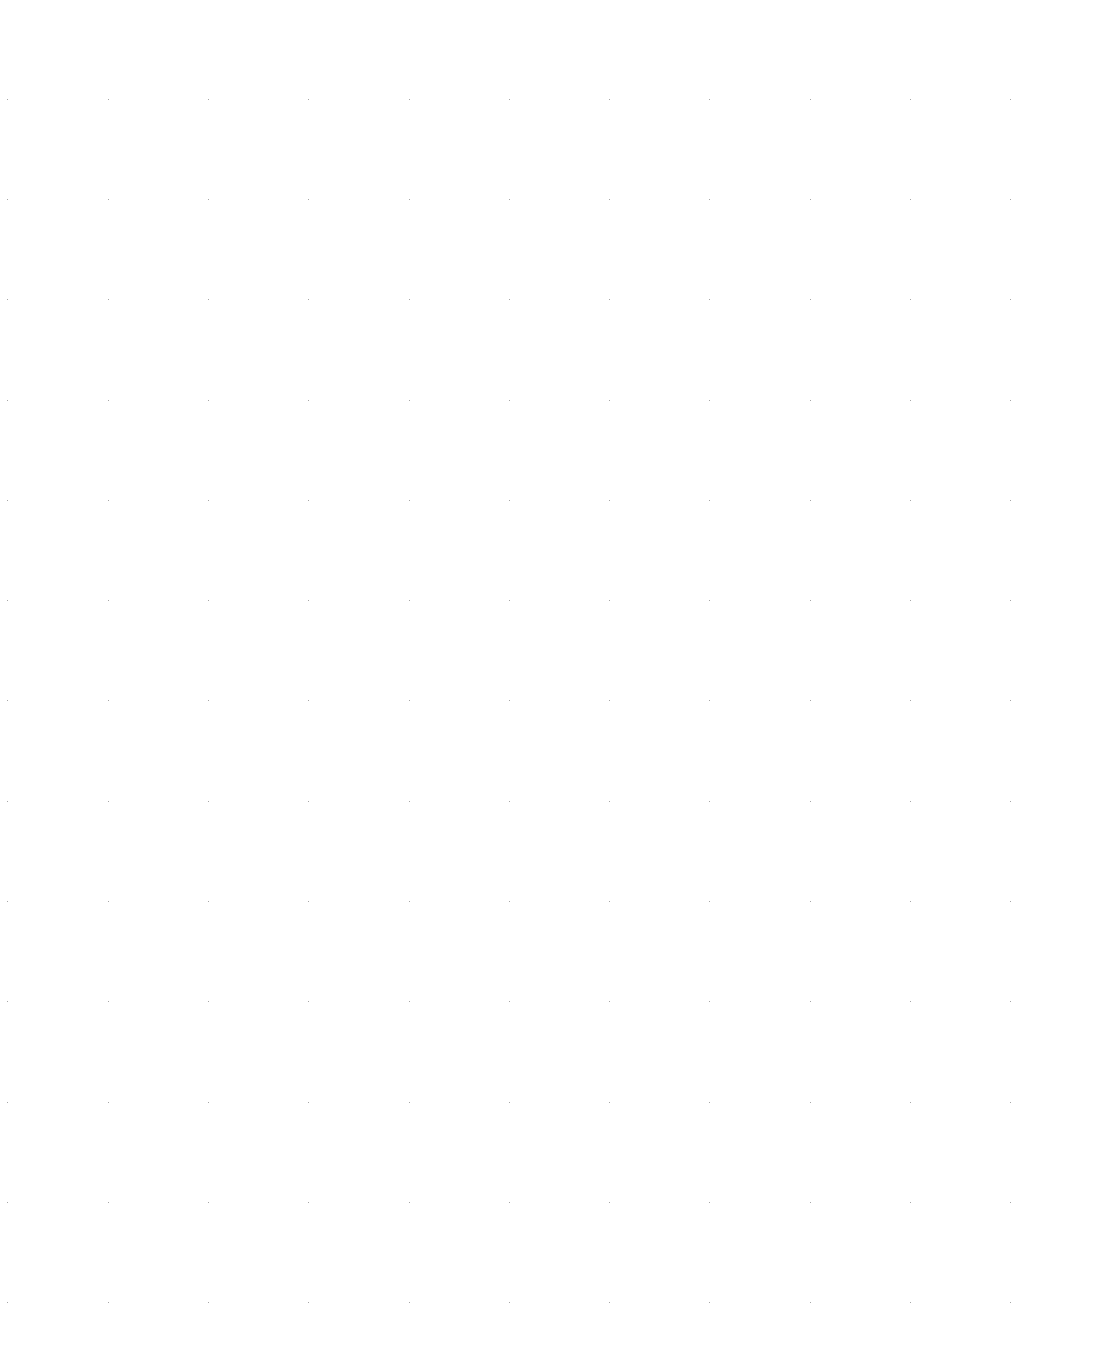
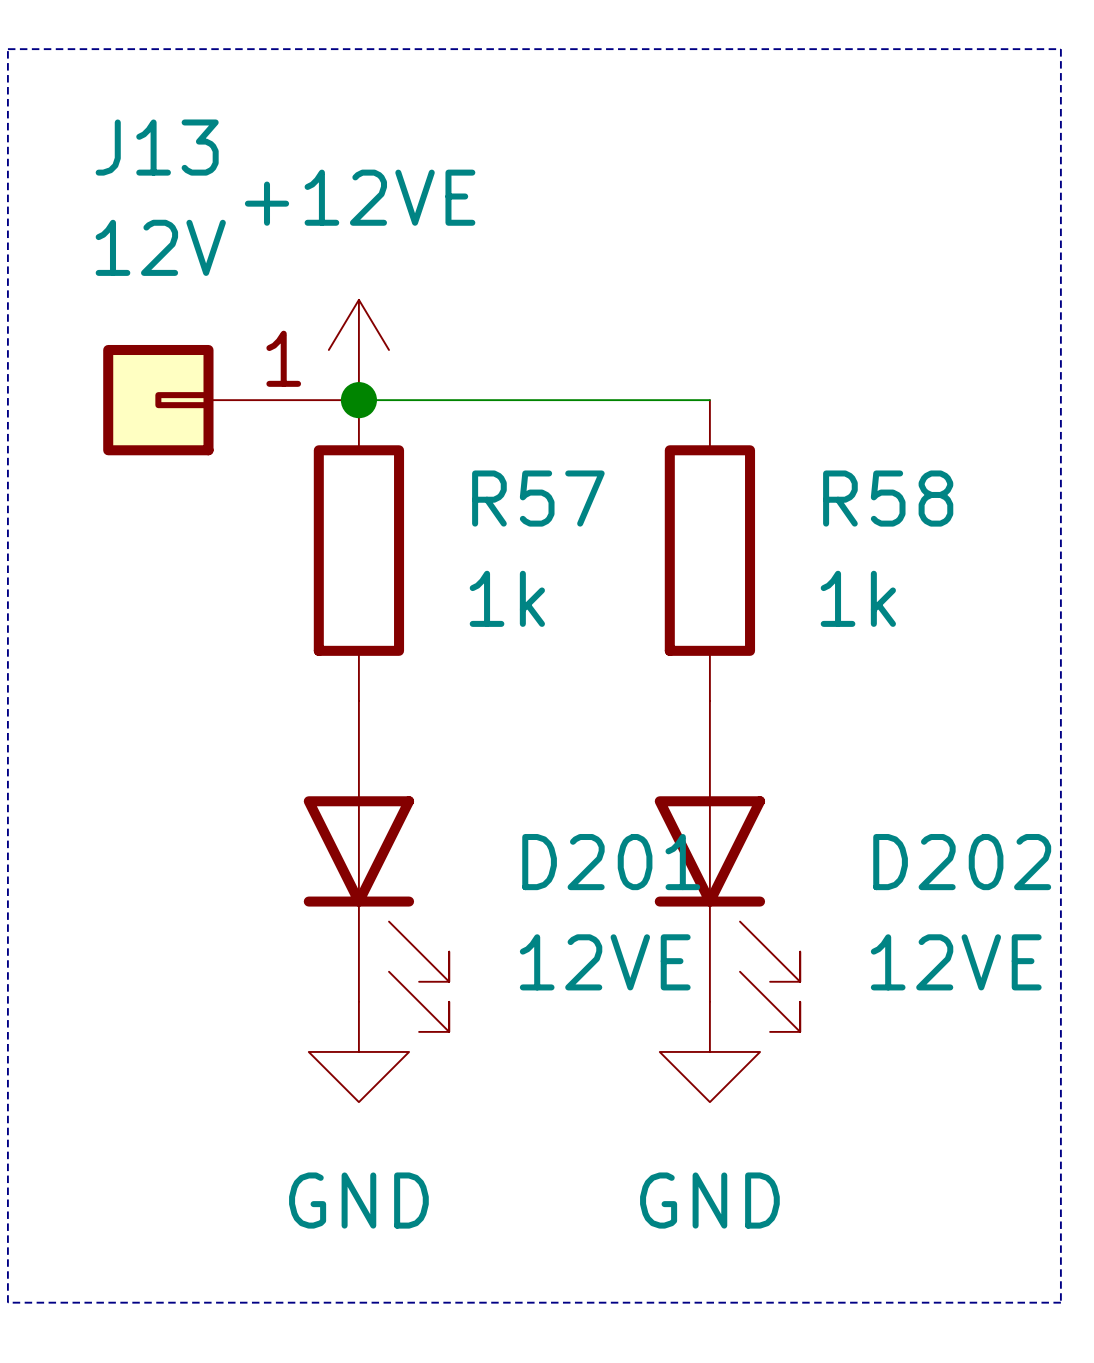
line: none -> (7, 49) (7, 1302) (1060, 1302) (1060, 49) (7, 49)
power symbol: none -> +12VE (358, 349)
J13: none -> 12V (231, 400)
wire: none -> (358, 400) (709, 400)
junction: none -> (358, 400)
R57: none -> 1k (358, 550)
R58: none -> 1k (709, 550)
D201: none -> 12VE (376, 866)
D202: none -> 12VE (727, 866)
power symbol: none -> GND (358, 1051)
power symbol: none -> GND (709, 1051)

